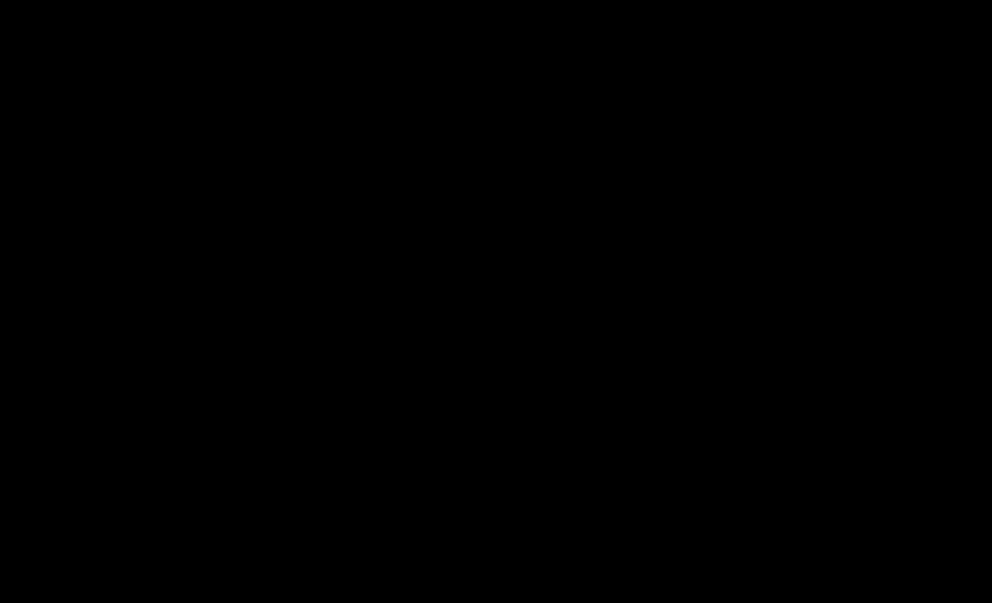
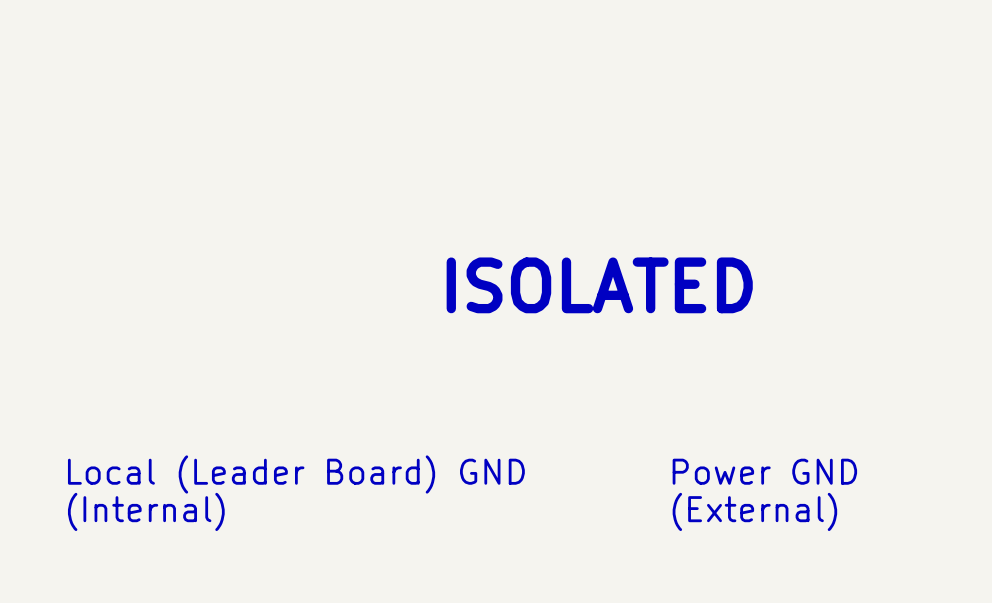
text: none -> ISOLATED (599, 285)
text: none -> Power GND (764, 471)
text: none -> Local (Leader Board) GND (296, 474)
text: none -> (Internal) (146, 511)
text: none -> (External) (754, 511)

